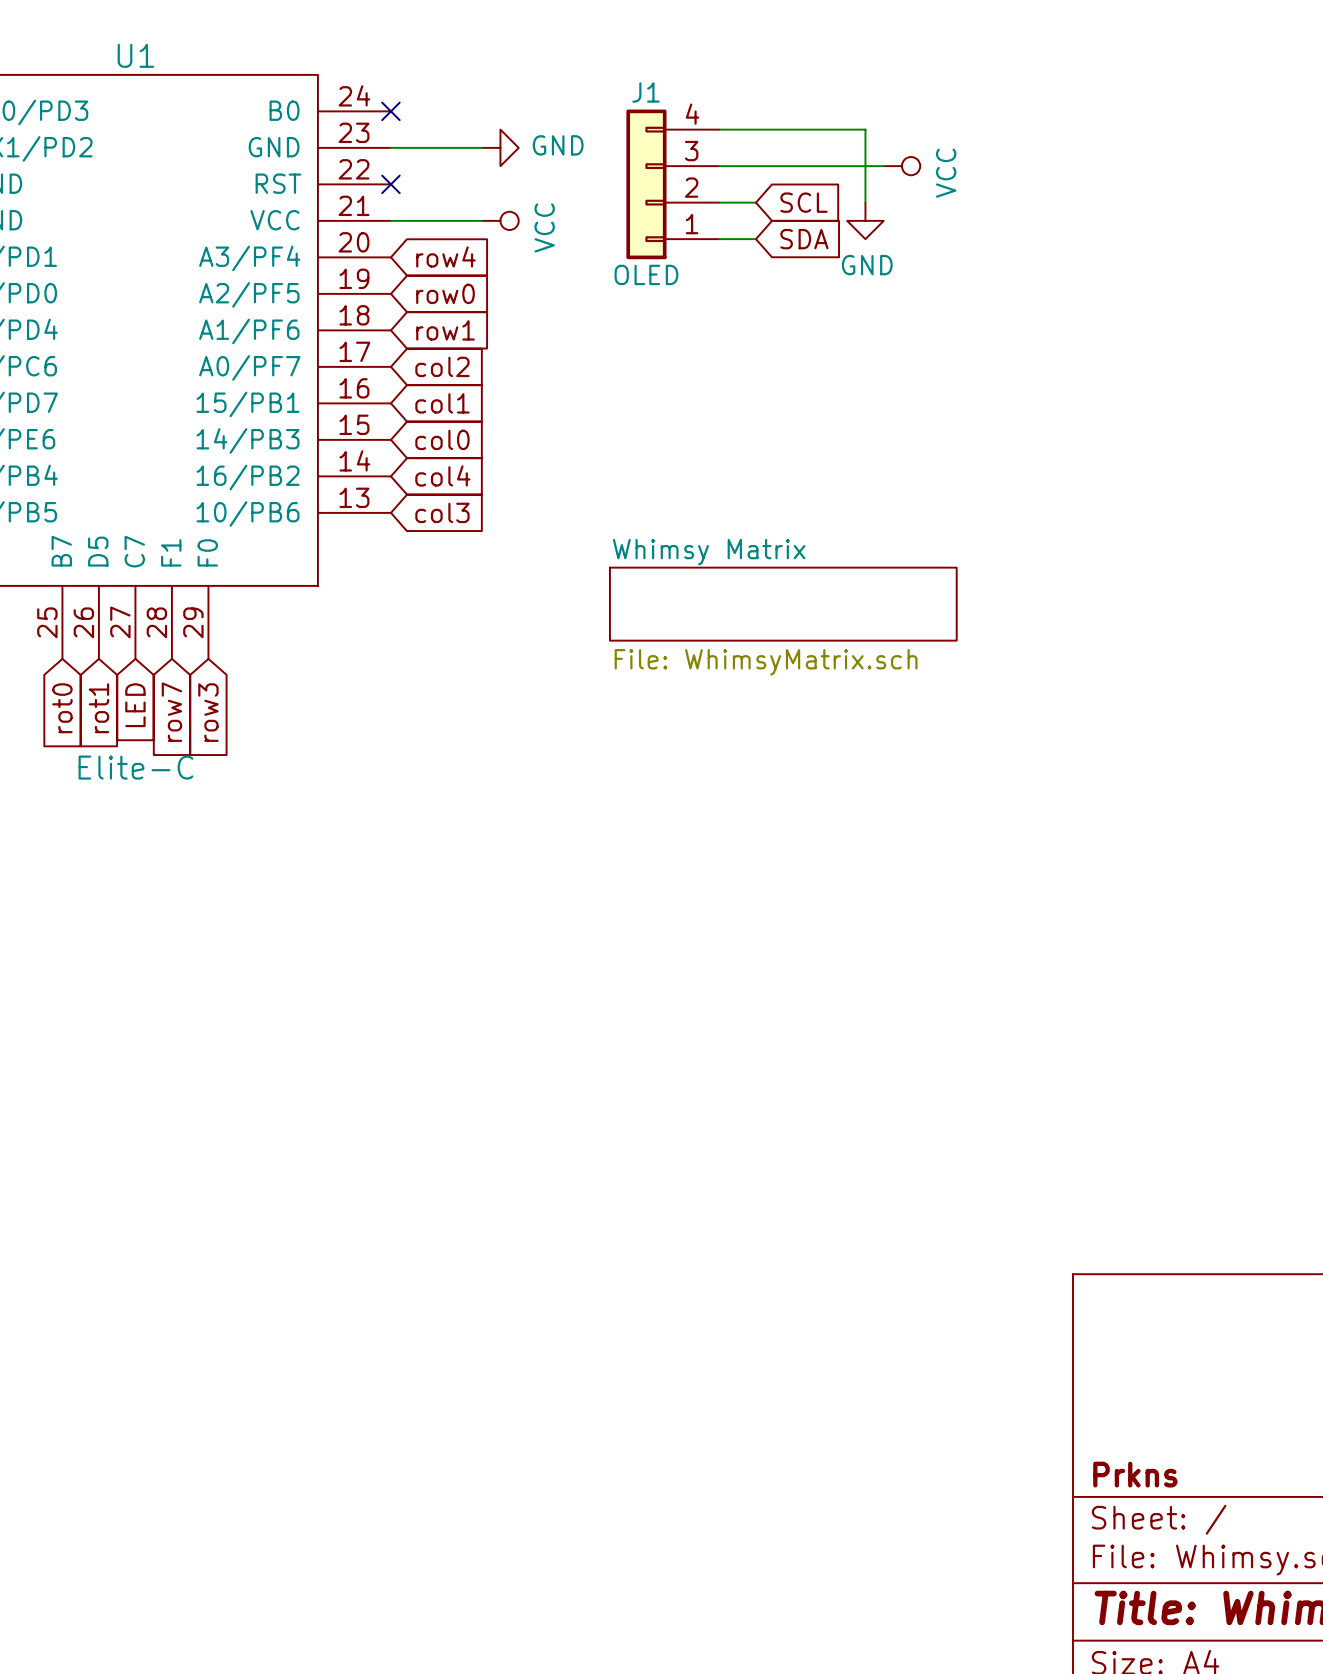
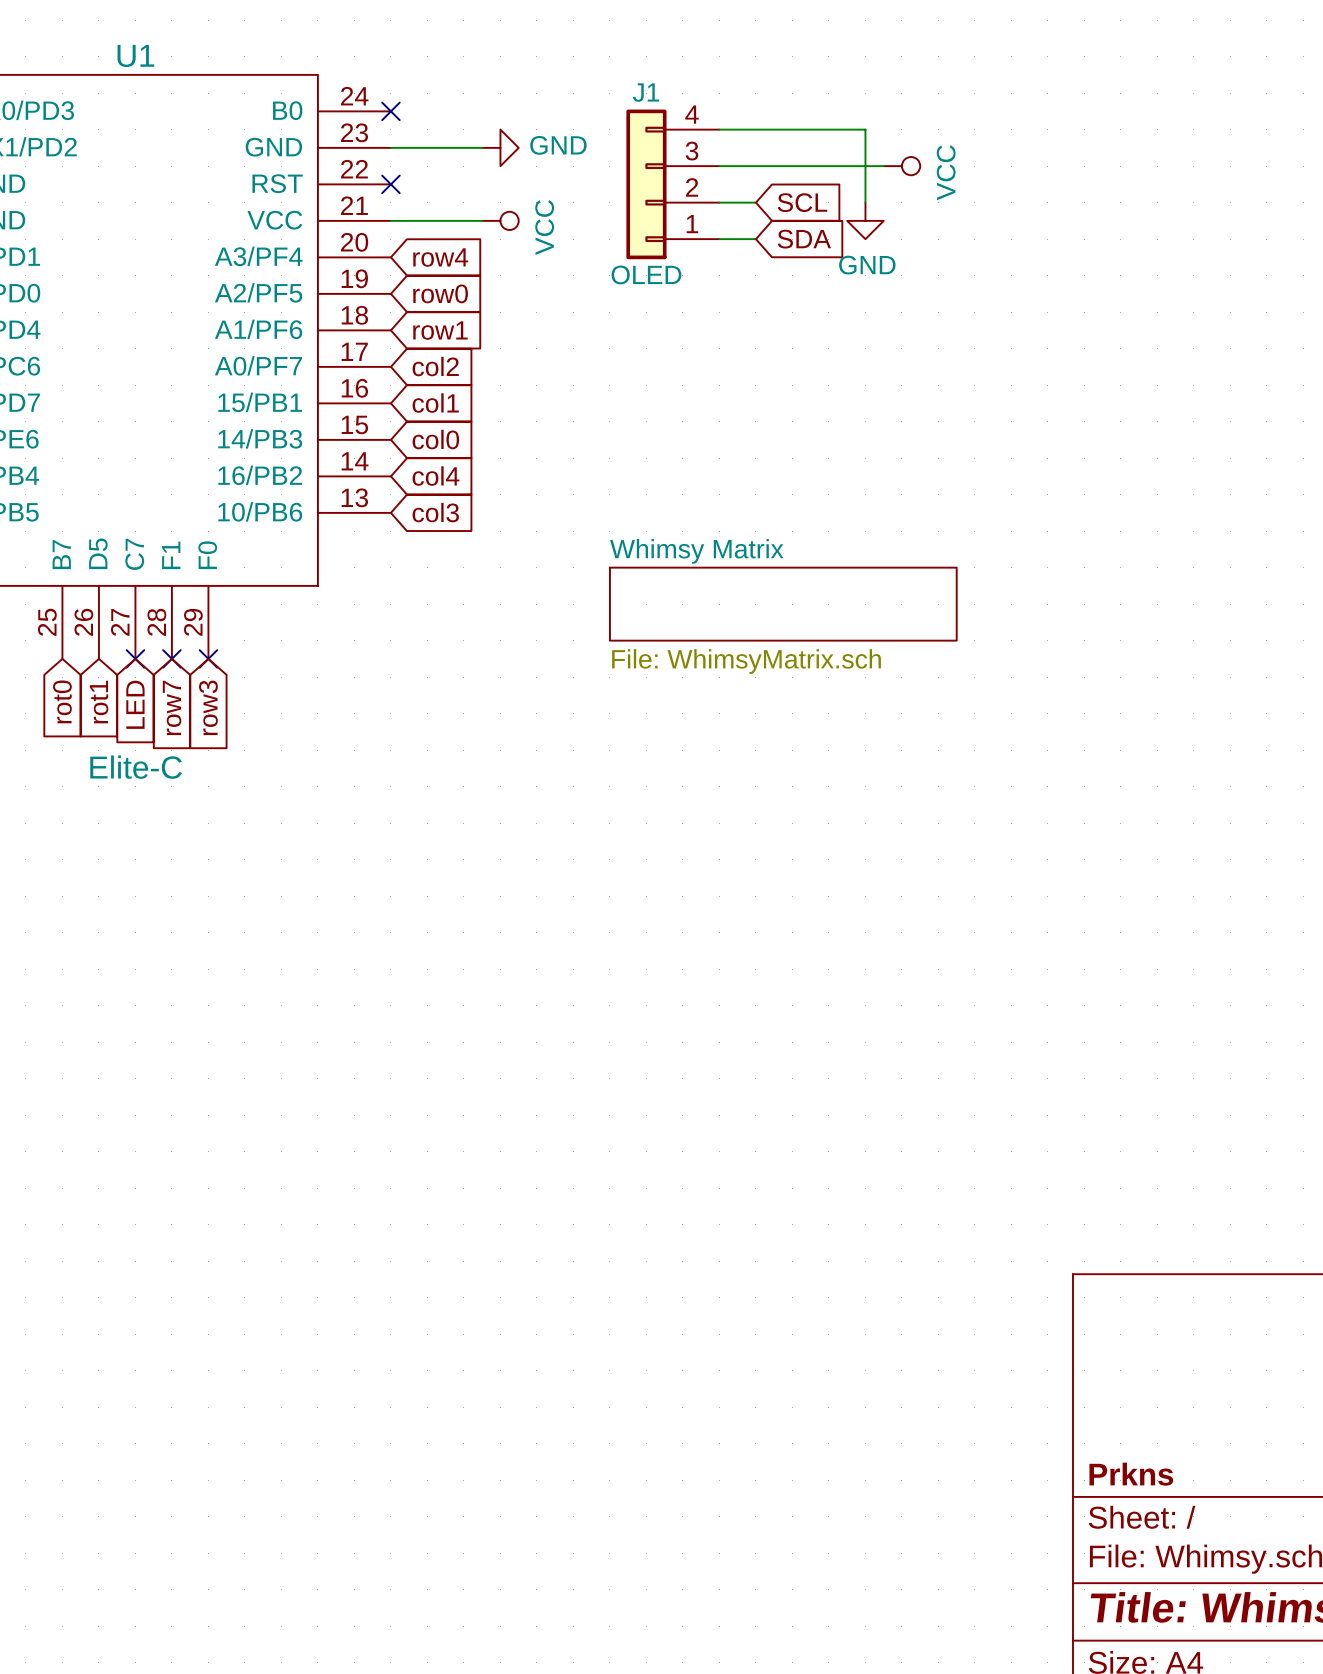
no-connect mark: none -> (135, 658)
no-connect mark: none -> (171, 658)
no-connect mark: none -> (208, 658)

